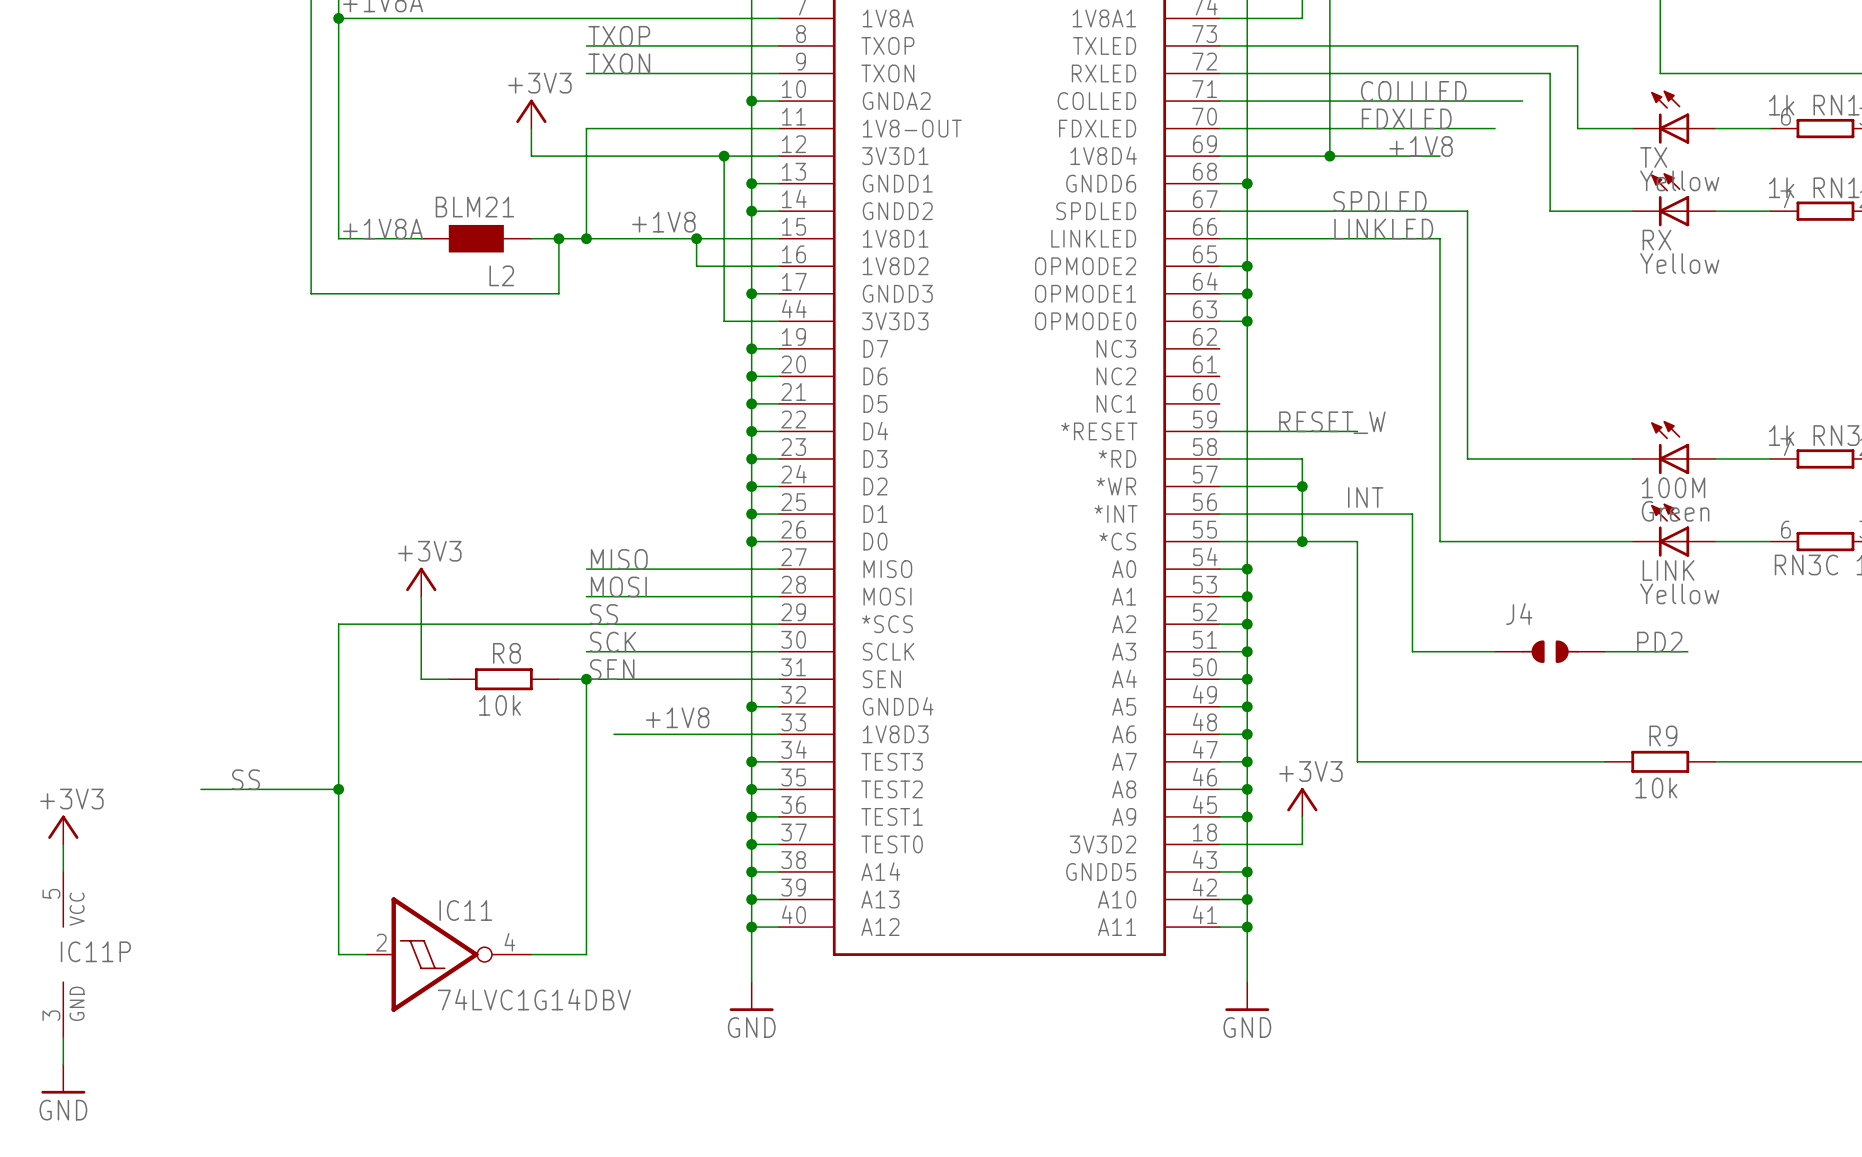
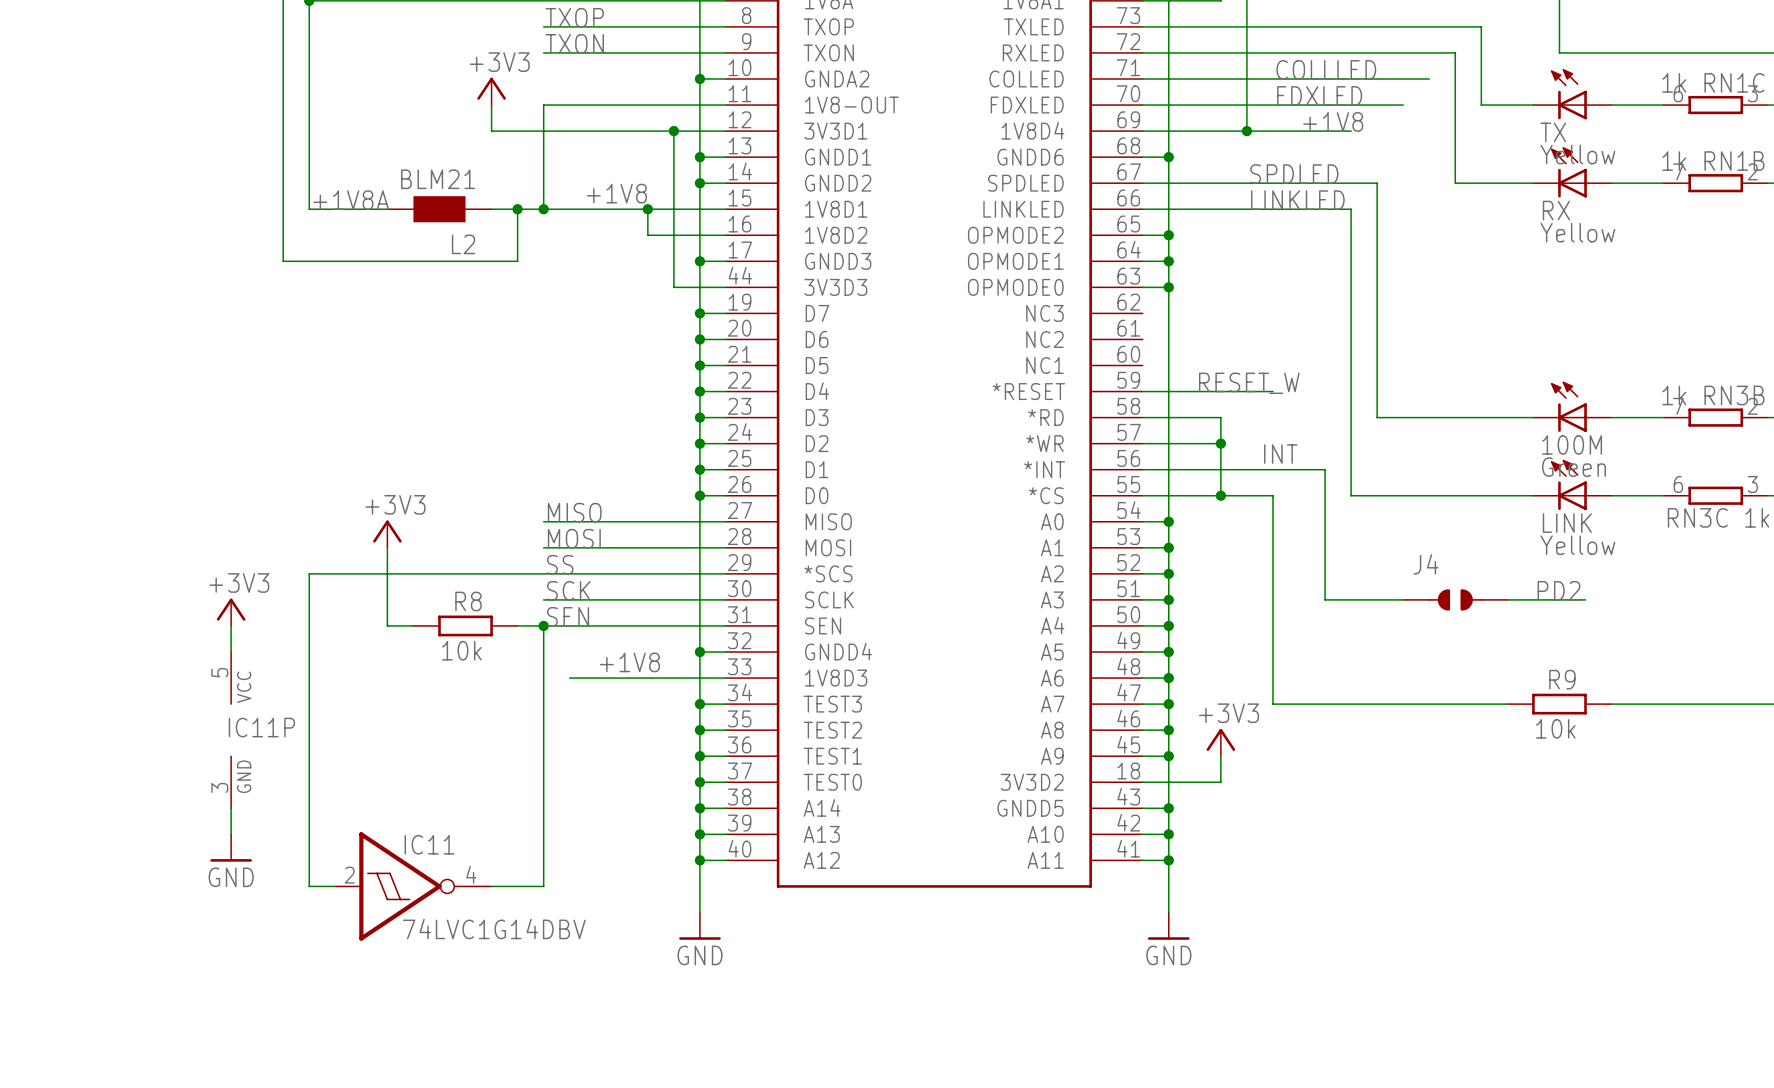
wire: none -> (231, 625) (231, 652)
label: SS (246, 779) -> none
wire: (200, 789) (338, 789) -> none
junction: (338, 789) -> none
power symbol position: +3V3 (63, 829) -> +3V3 (231, 612)
wire: (63, 844) (63, 871) -> (231, 808) (231, 834)
IC11P position: (63, 954) -> (231, 730)
wire: (63, 1037) (63, 1064) -> none
power symbol position: GND (63, 1079) -> GND (231, 848)

